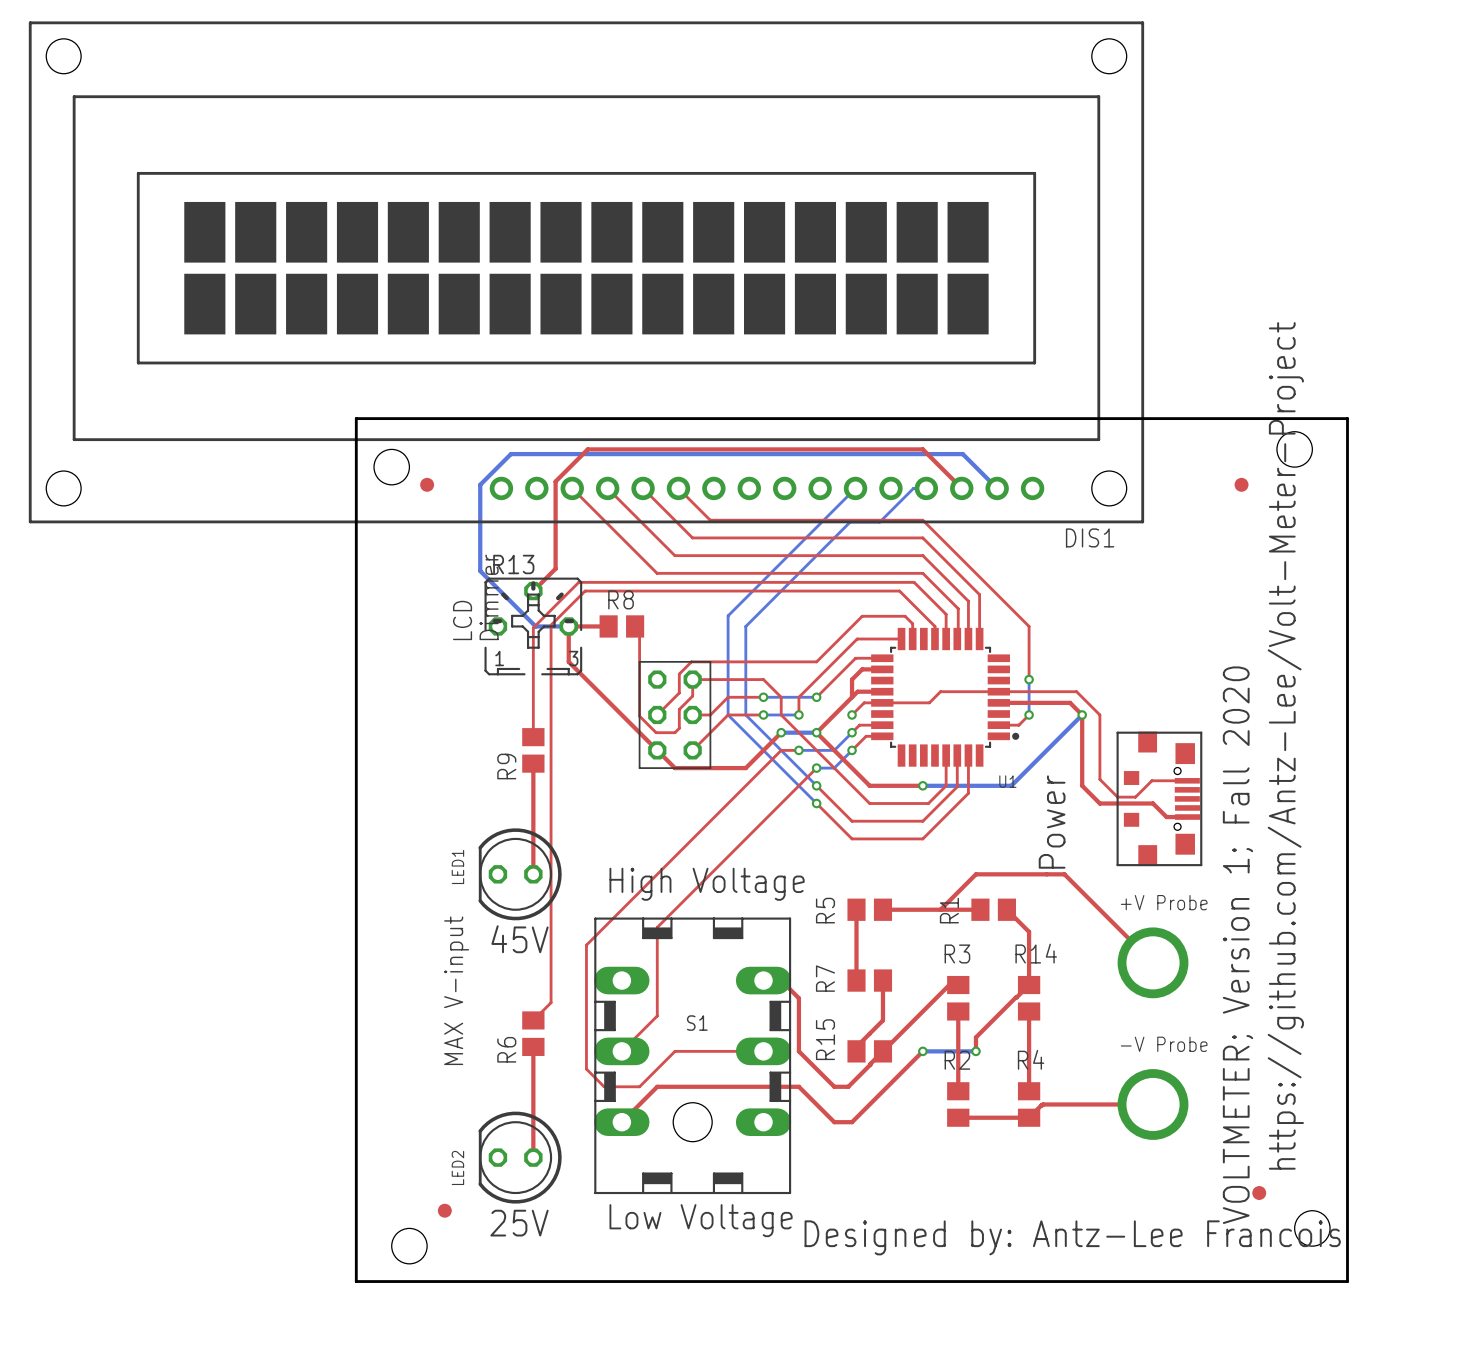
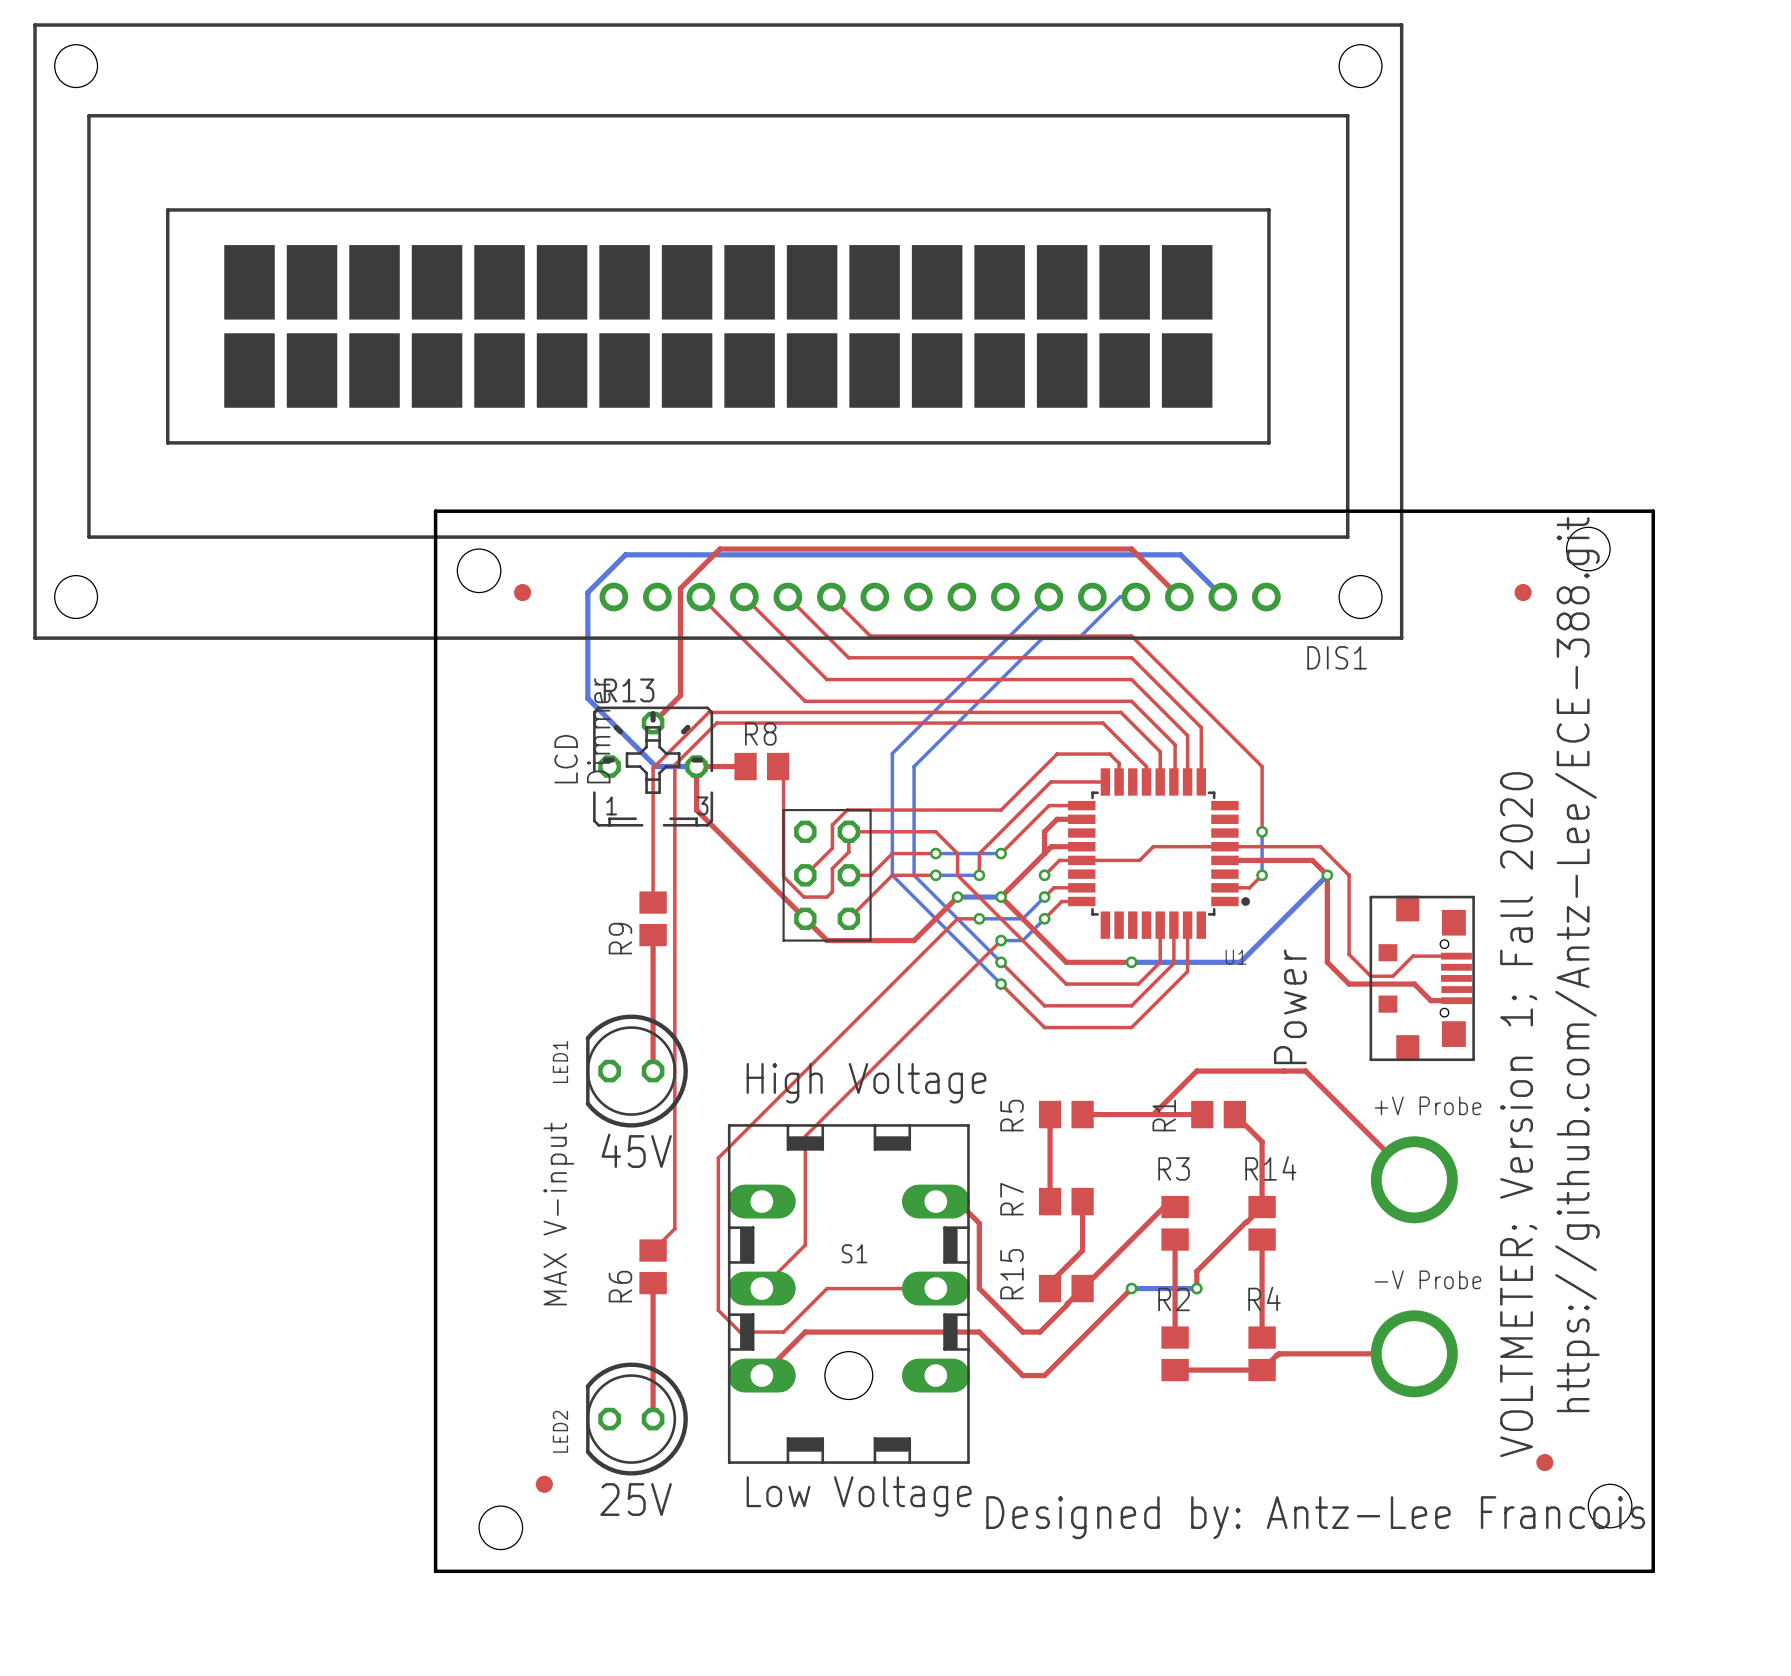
text: https://github.com/Antz-Lee/Volt-Meter-Project (1285, 745) -> https://github.com/Antz-Lee/ECE-388.git (1577, 964)
text position: VOLTMETER; Version 1; Fall 2020 (1238, 945) -> VOLTMETER; Version 1; Fall 2020 (1518, 1114)

